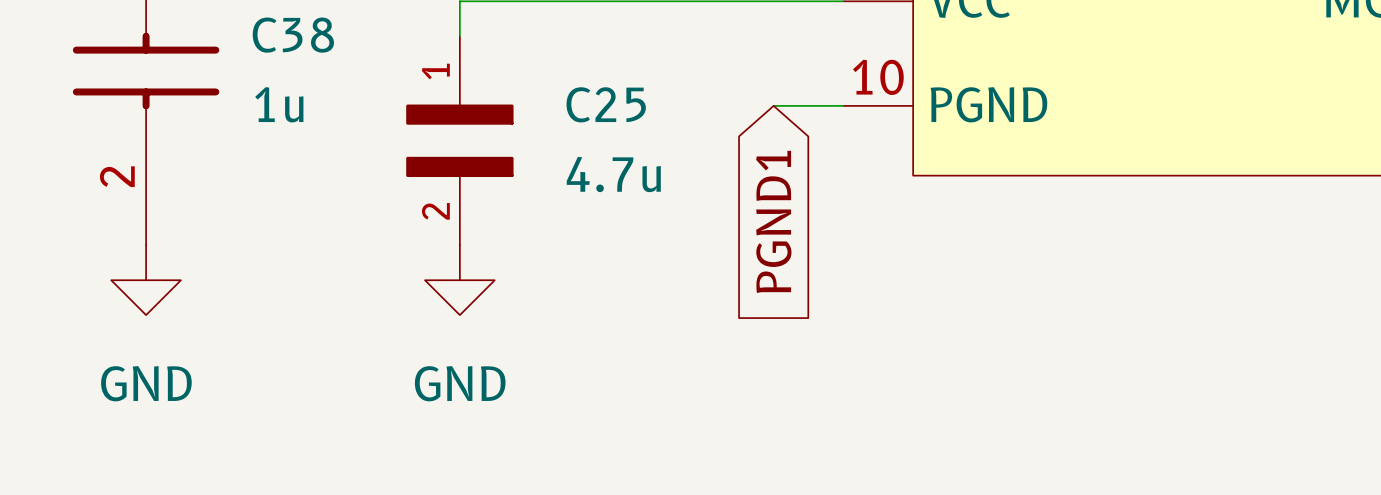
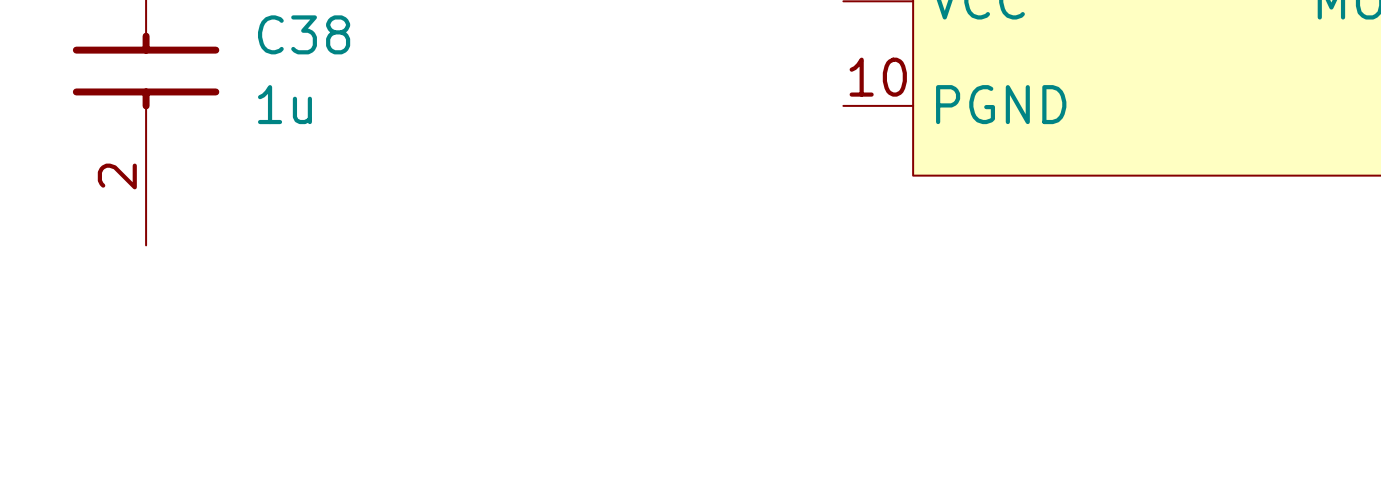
wire: (843, 1) (459, 1) (459, 36) -> none
wire: (773, 105) (843, 105) -> none
C25: 4.7u (459, 140) -> none
global label: PGND1 (773, 221) -> none
power symbol: GND (146, 280) -> none
power symbol: GND (459, 280) -> none

